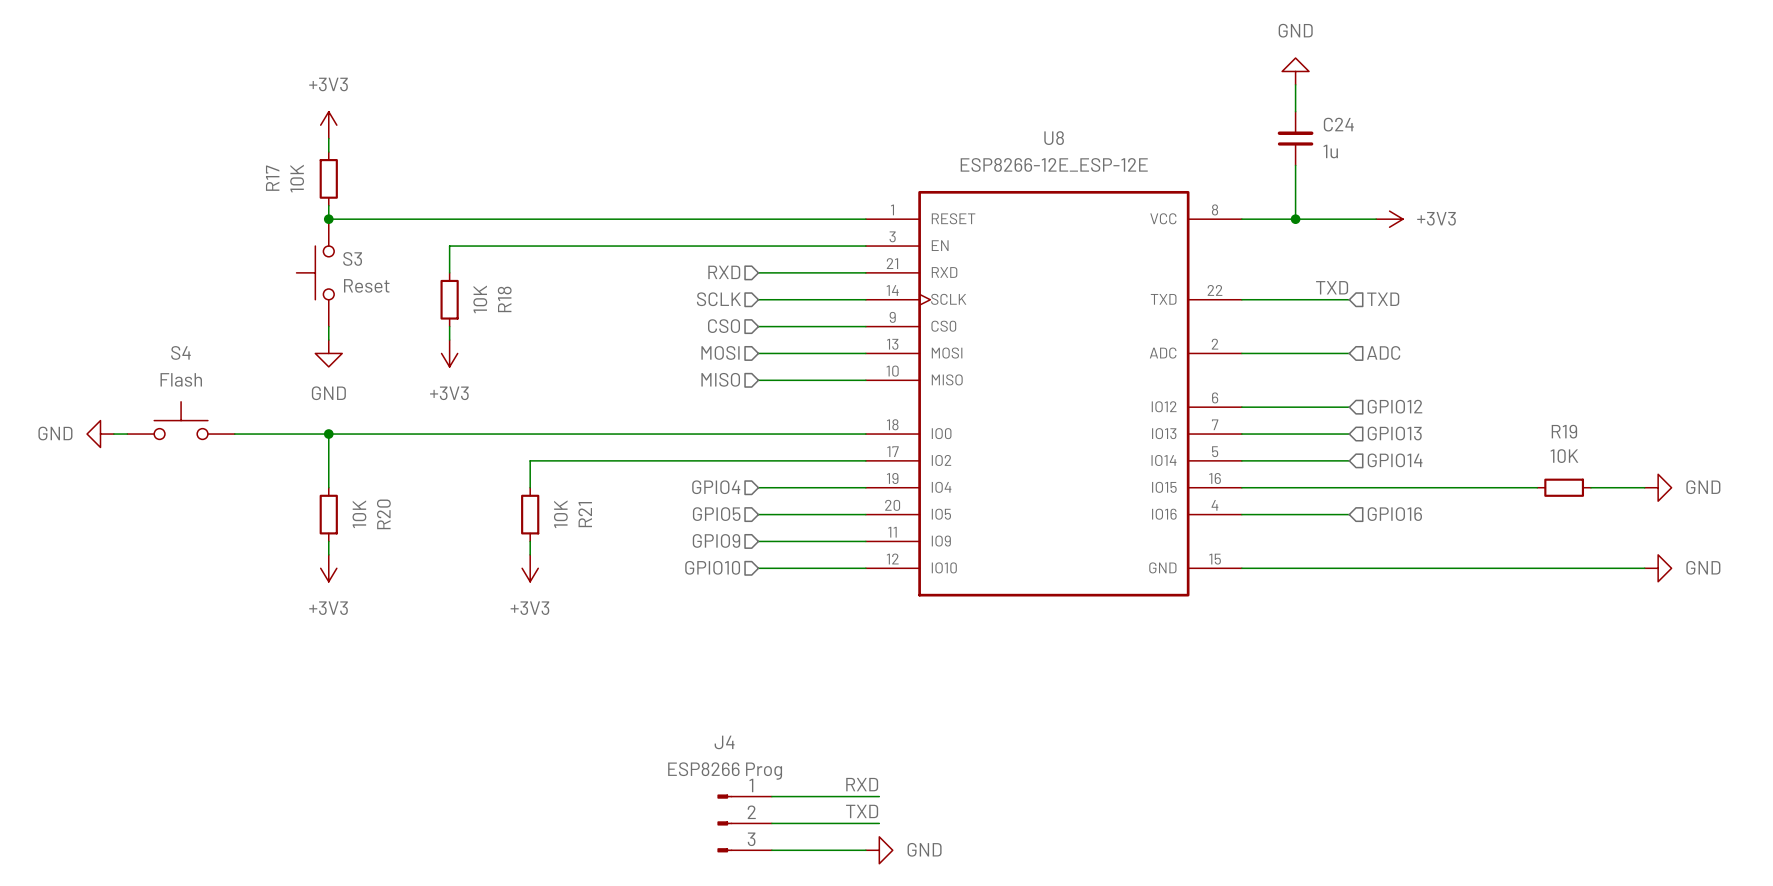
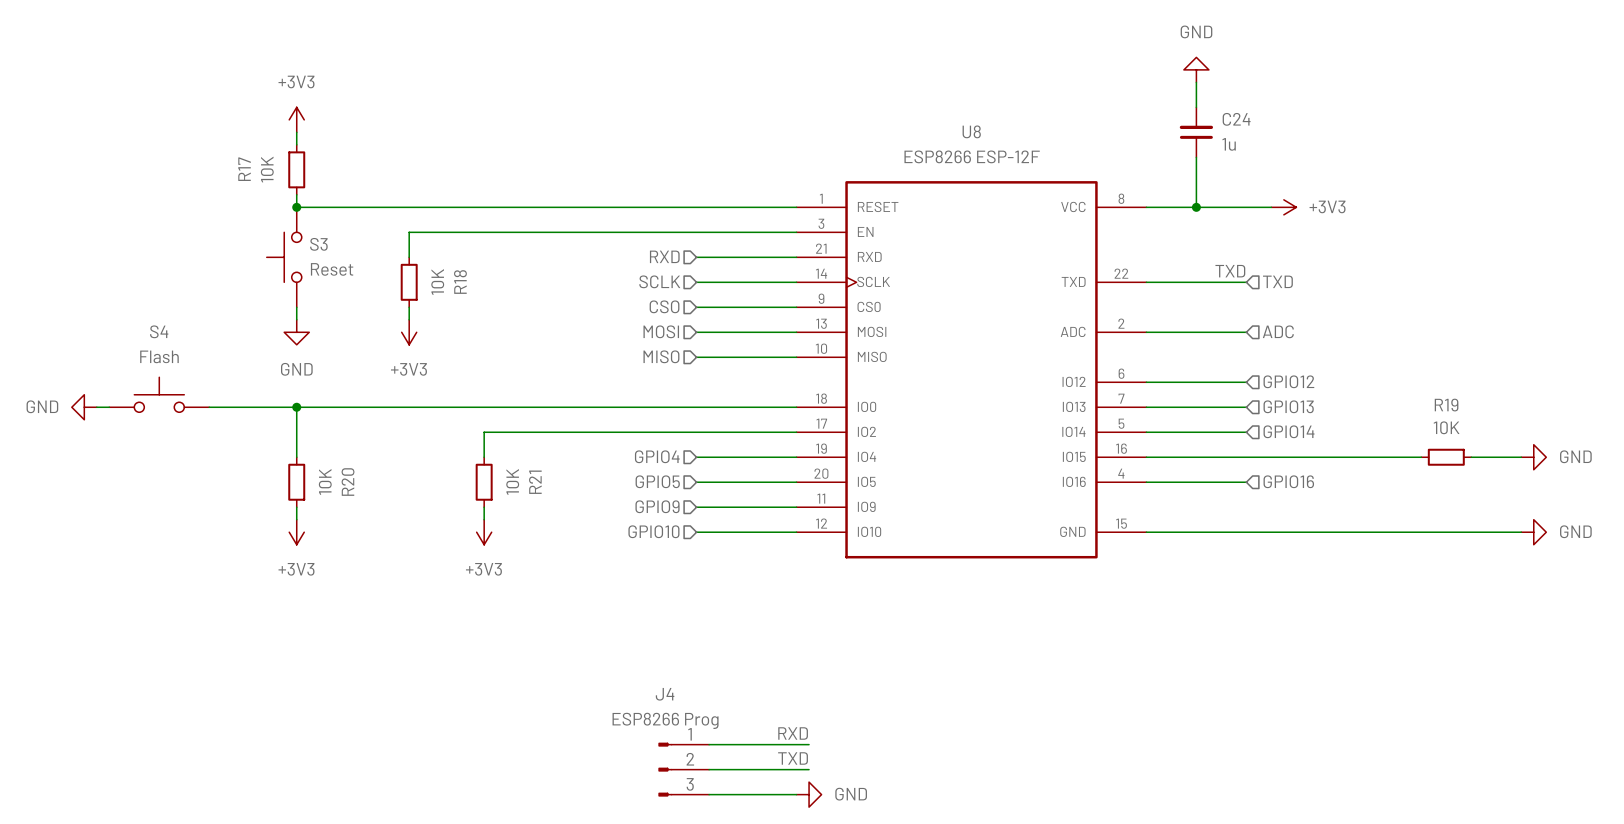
U8 value: ESP8266-12E_ESP-12E (1054, 164) -> ESP8266 ESP-12F (972, 156)

